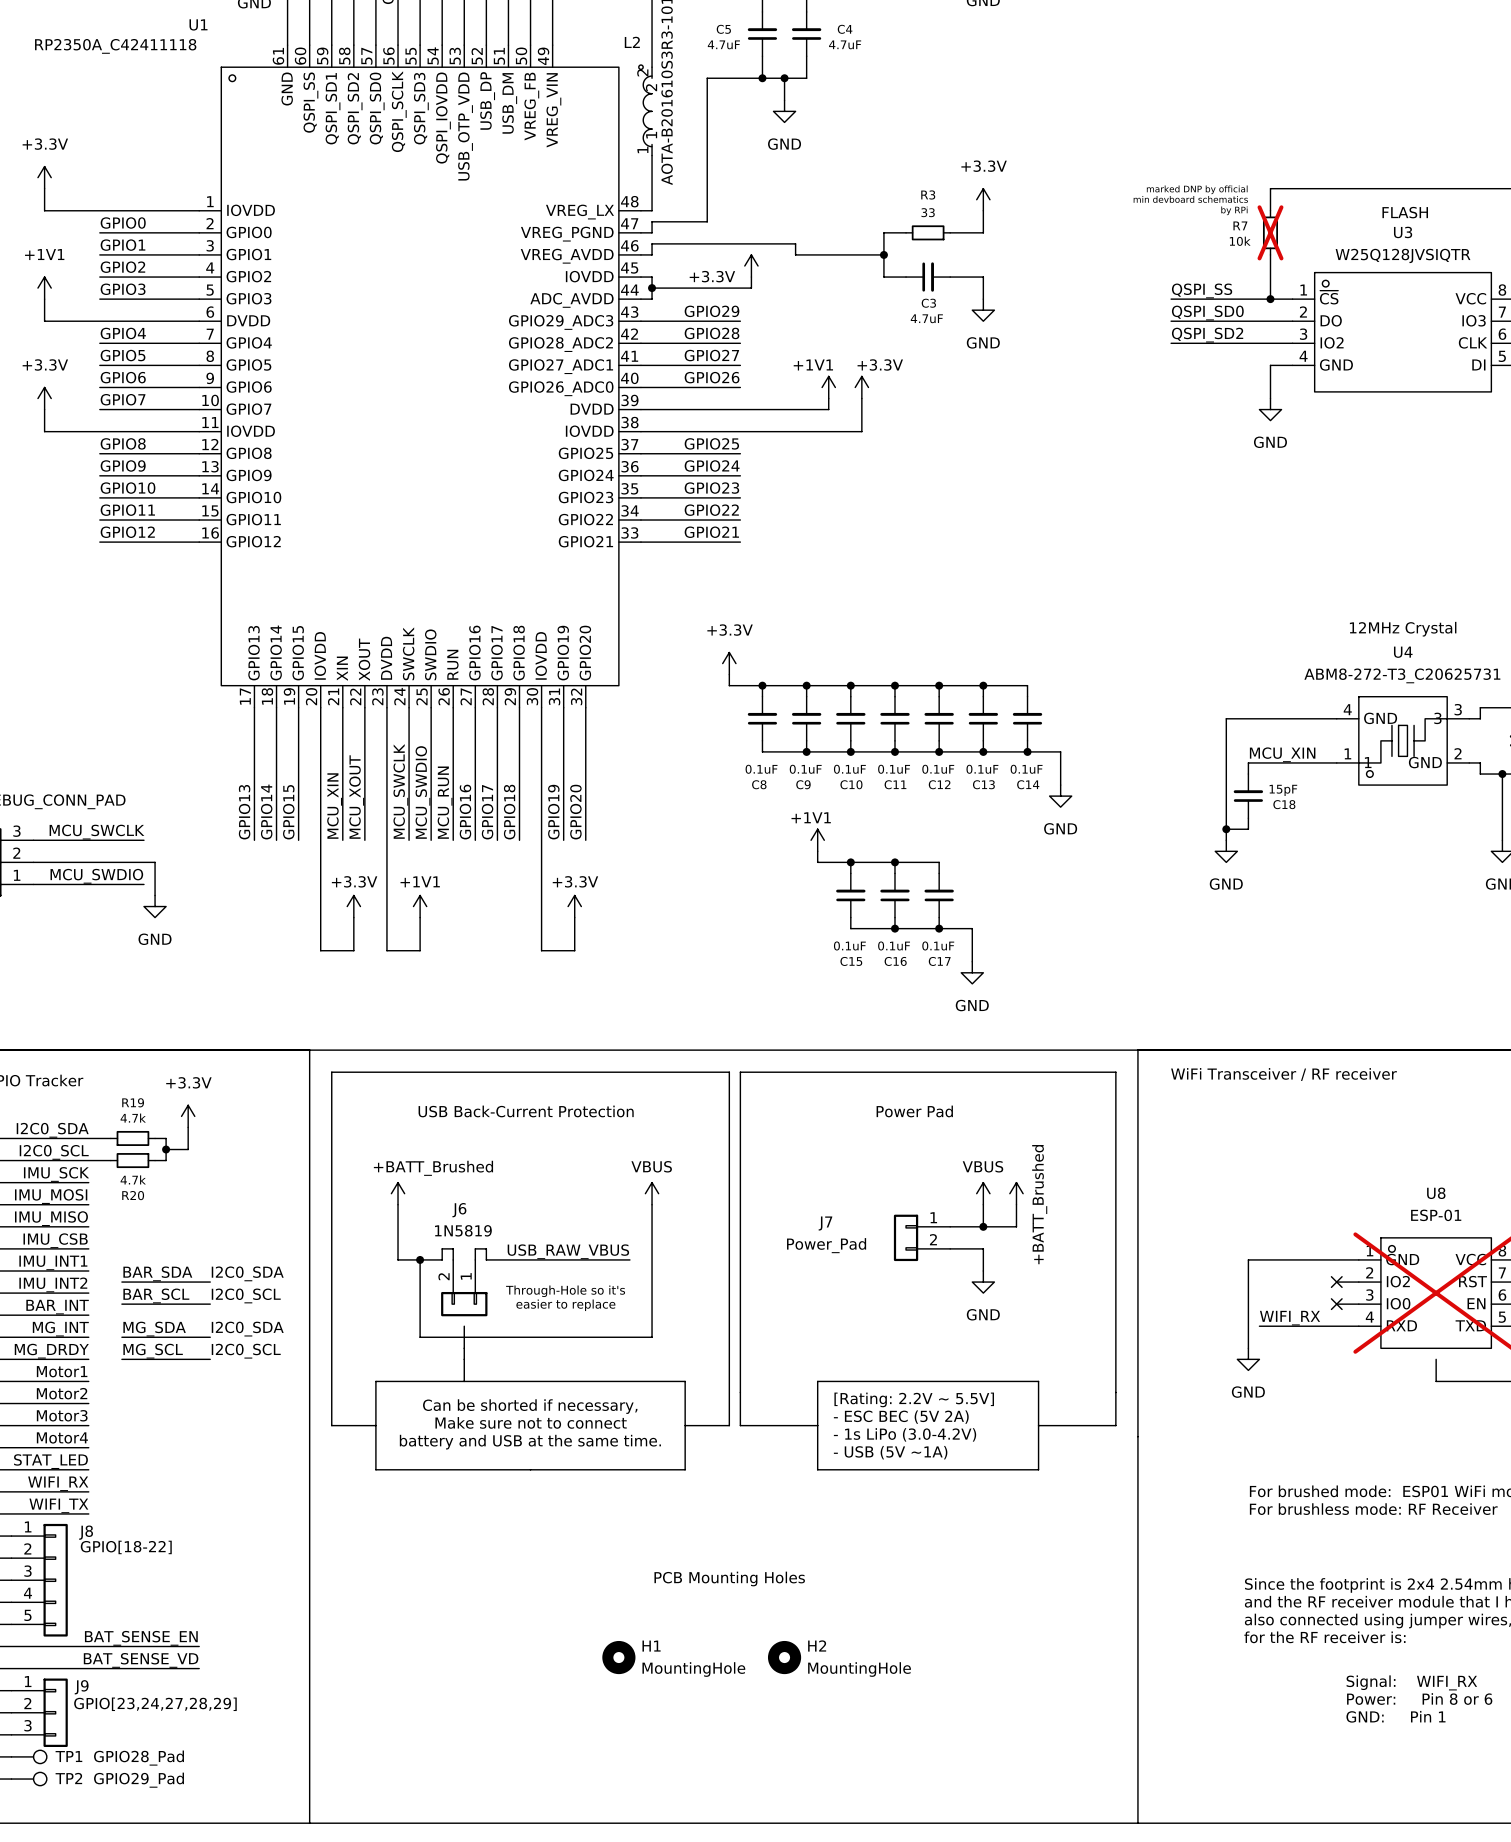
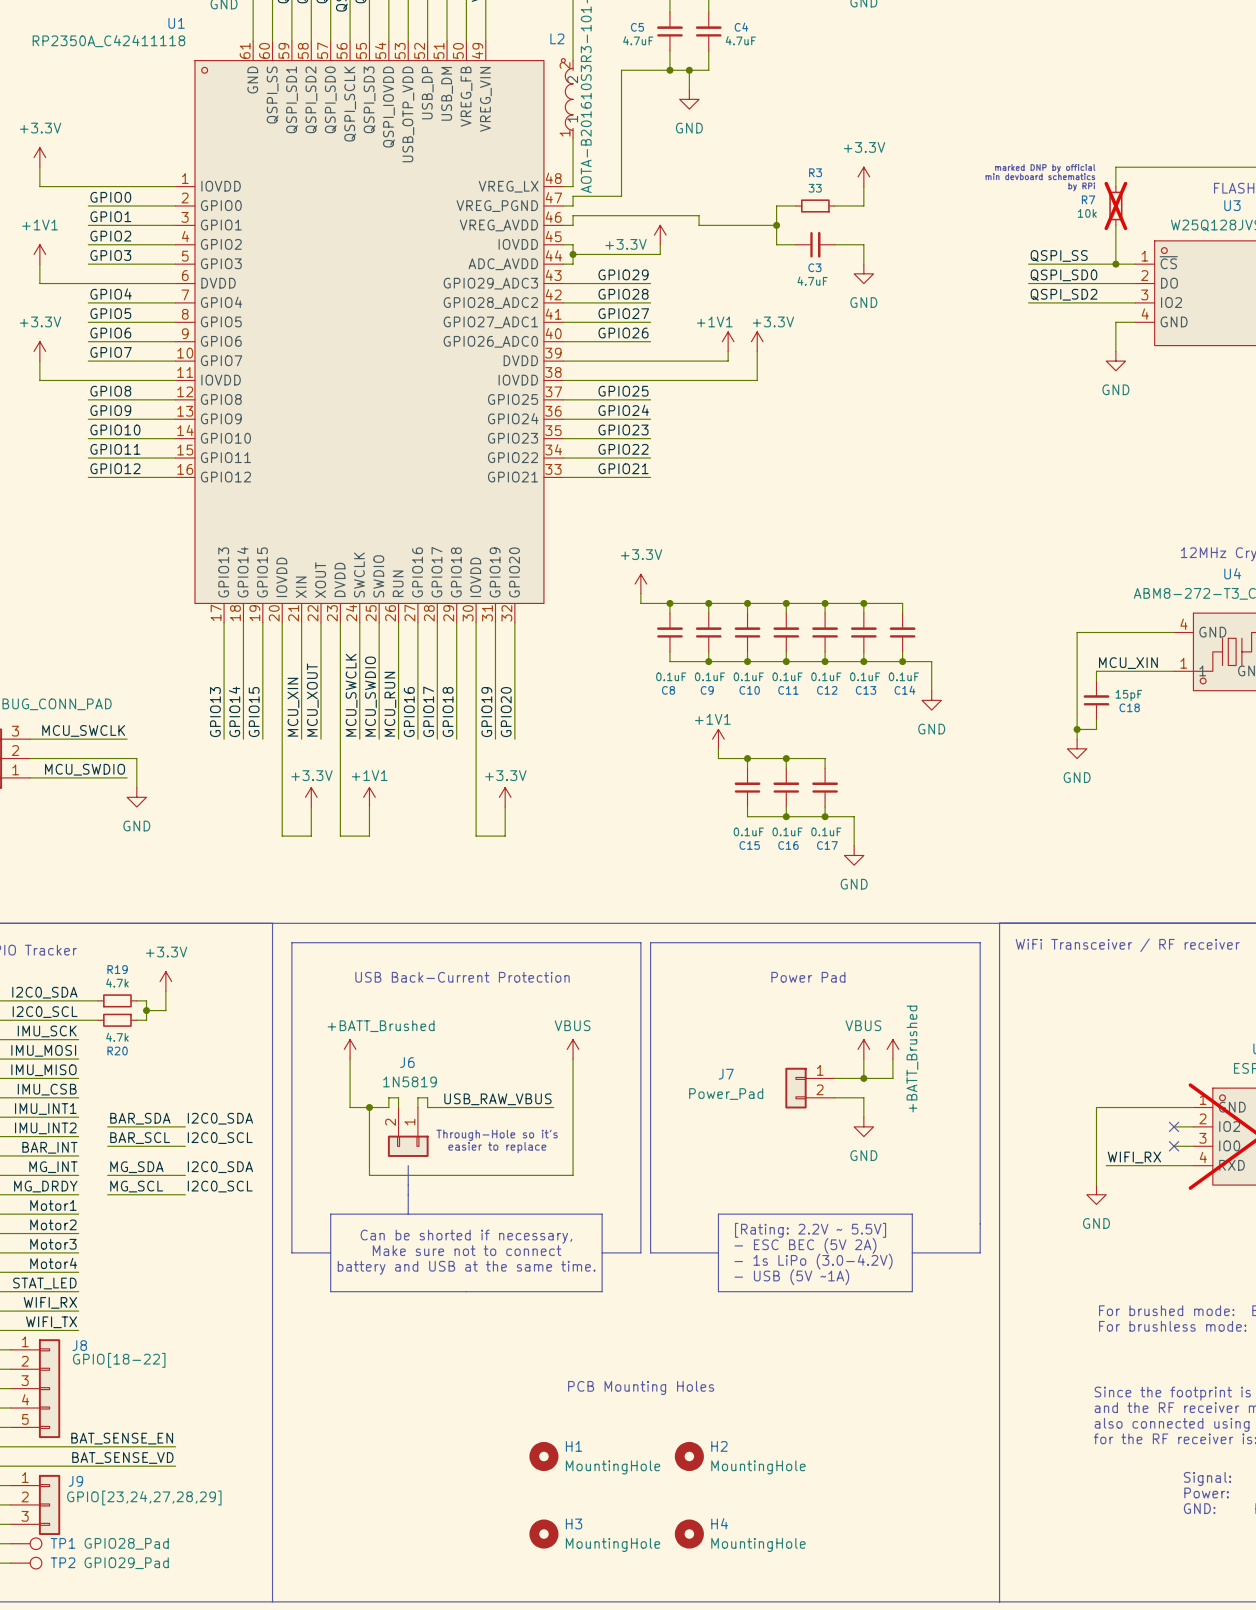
H3: none -> MountingHole (543, 1534)
H4: none -> MountingHole (689, 1534)

